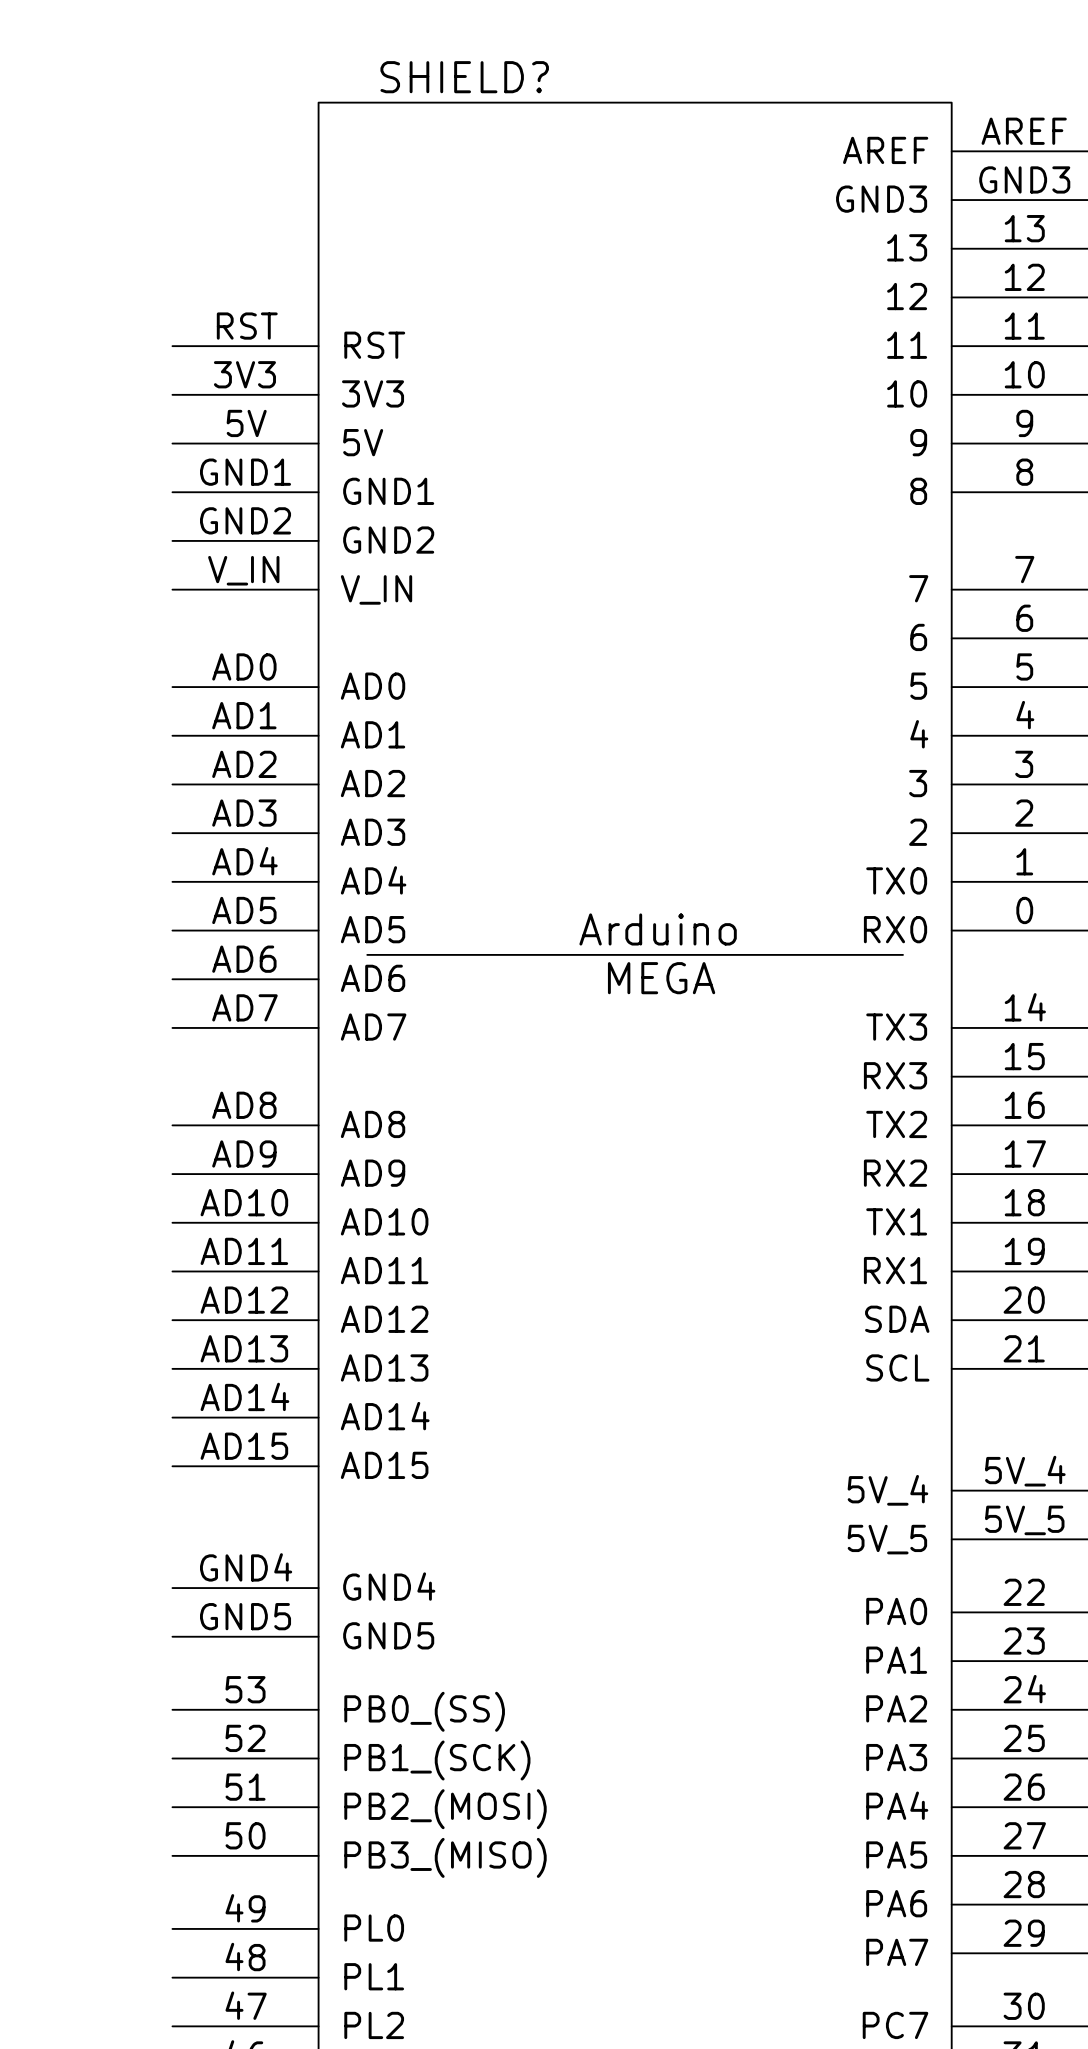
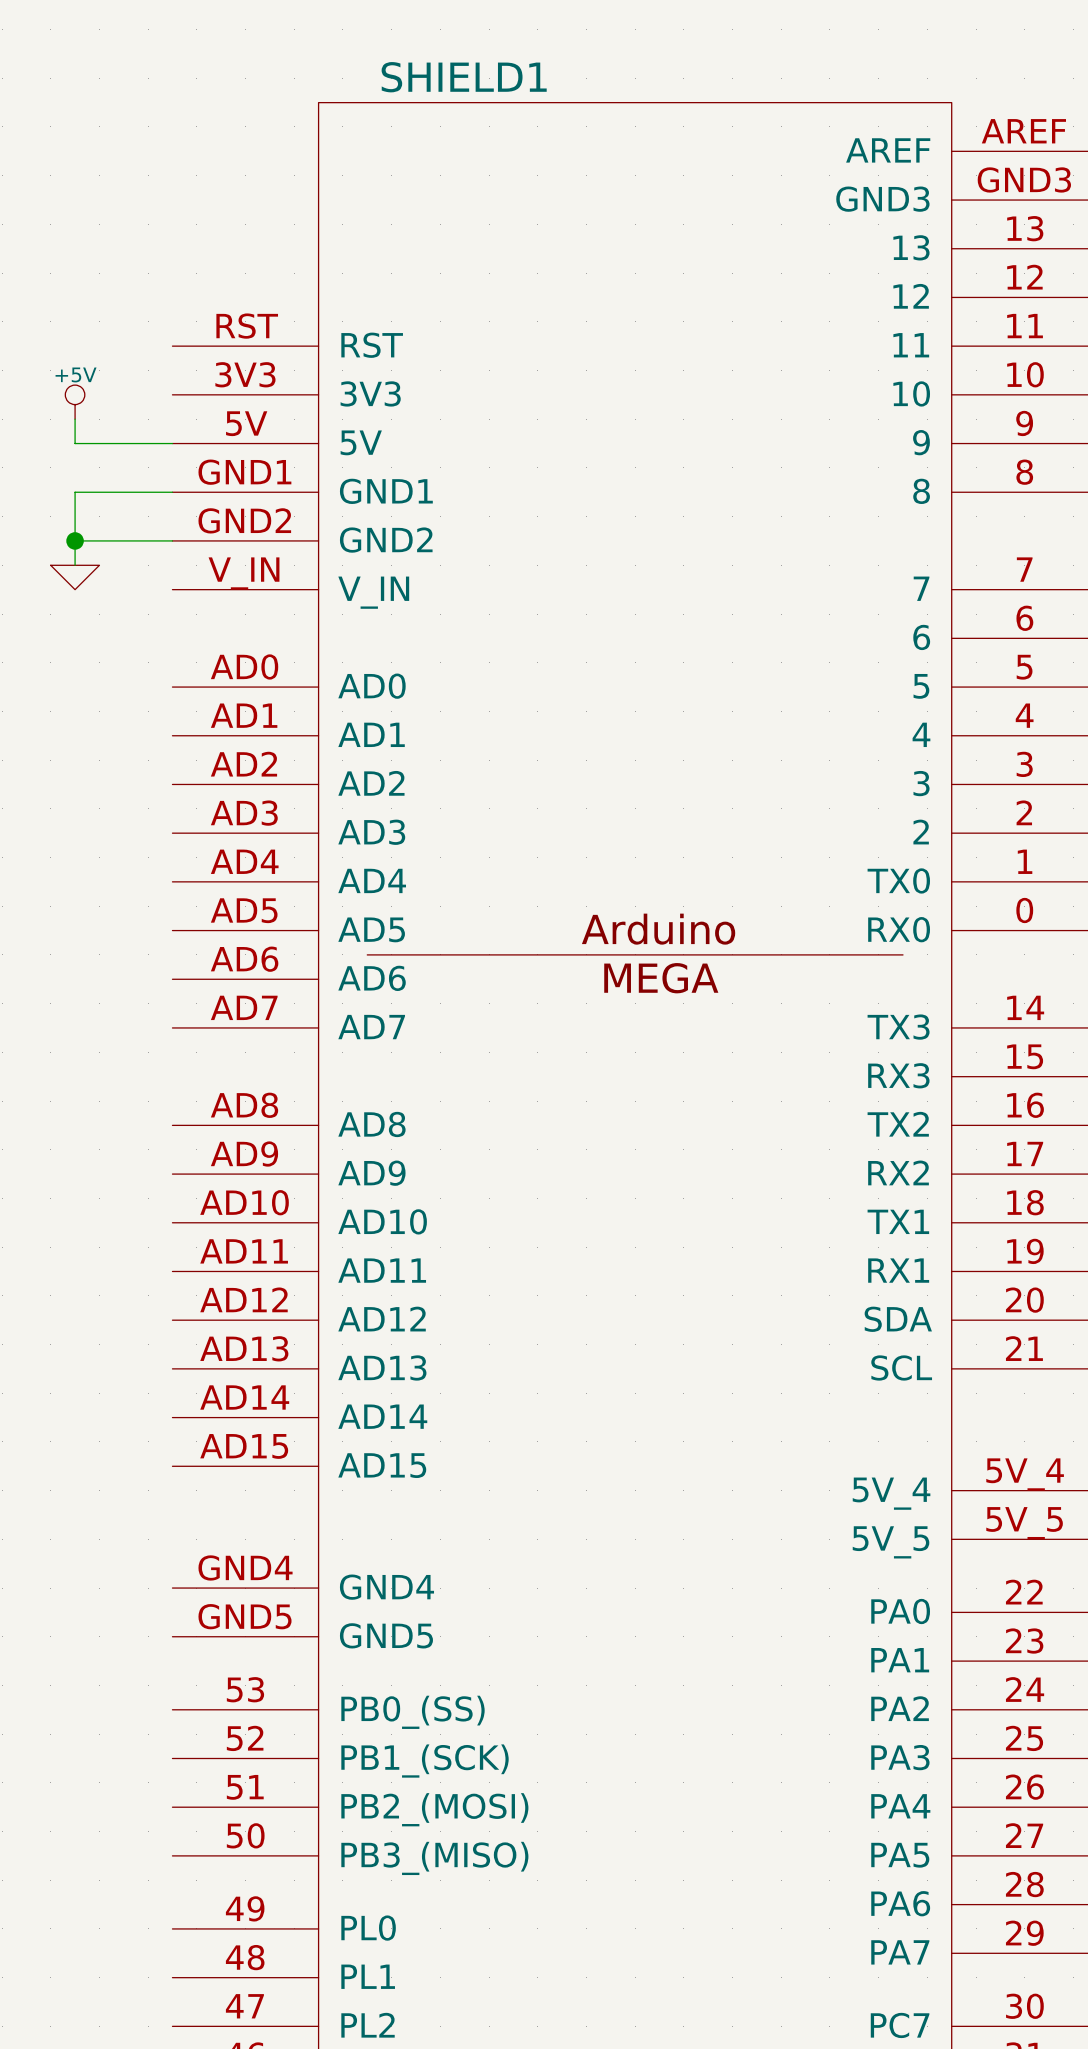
SHIELD? name: SHIELD? (464, 77) -> SHIELD1 (464, 77)
power symbol: none -> +5V (75, 402)
wire: none -> (75, 419) (75, 443) (172, 443)
wire: none -> (172, 492) (75, 492) (75, 565)
wire: none -> (75, 540) (172, 540)
junction: none -> (75, 540)
power symbol: none -> (75, 577)

